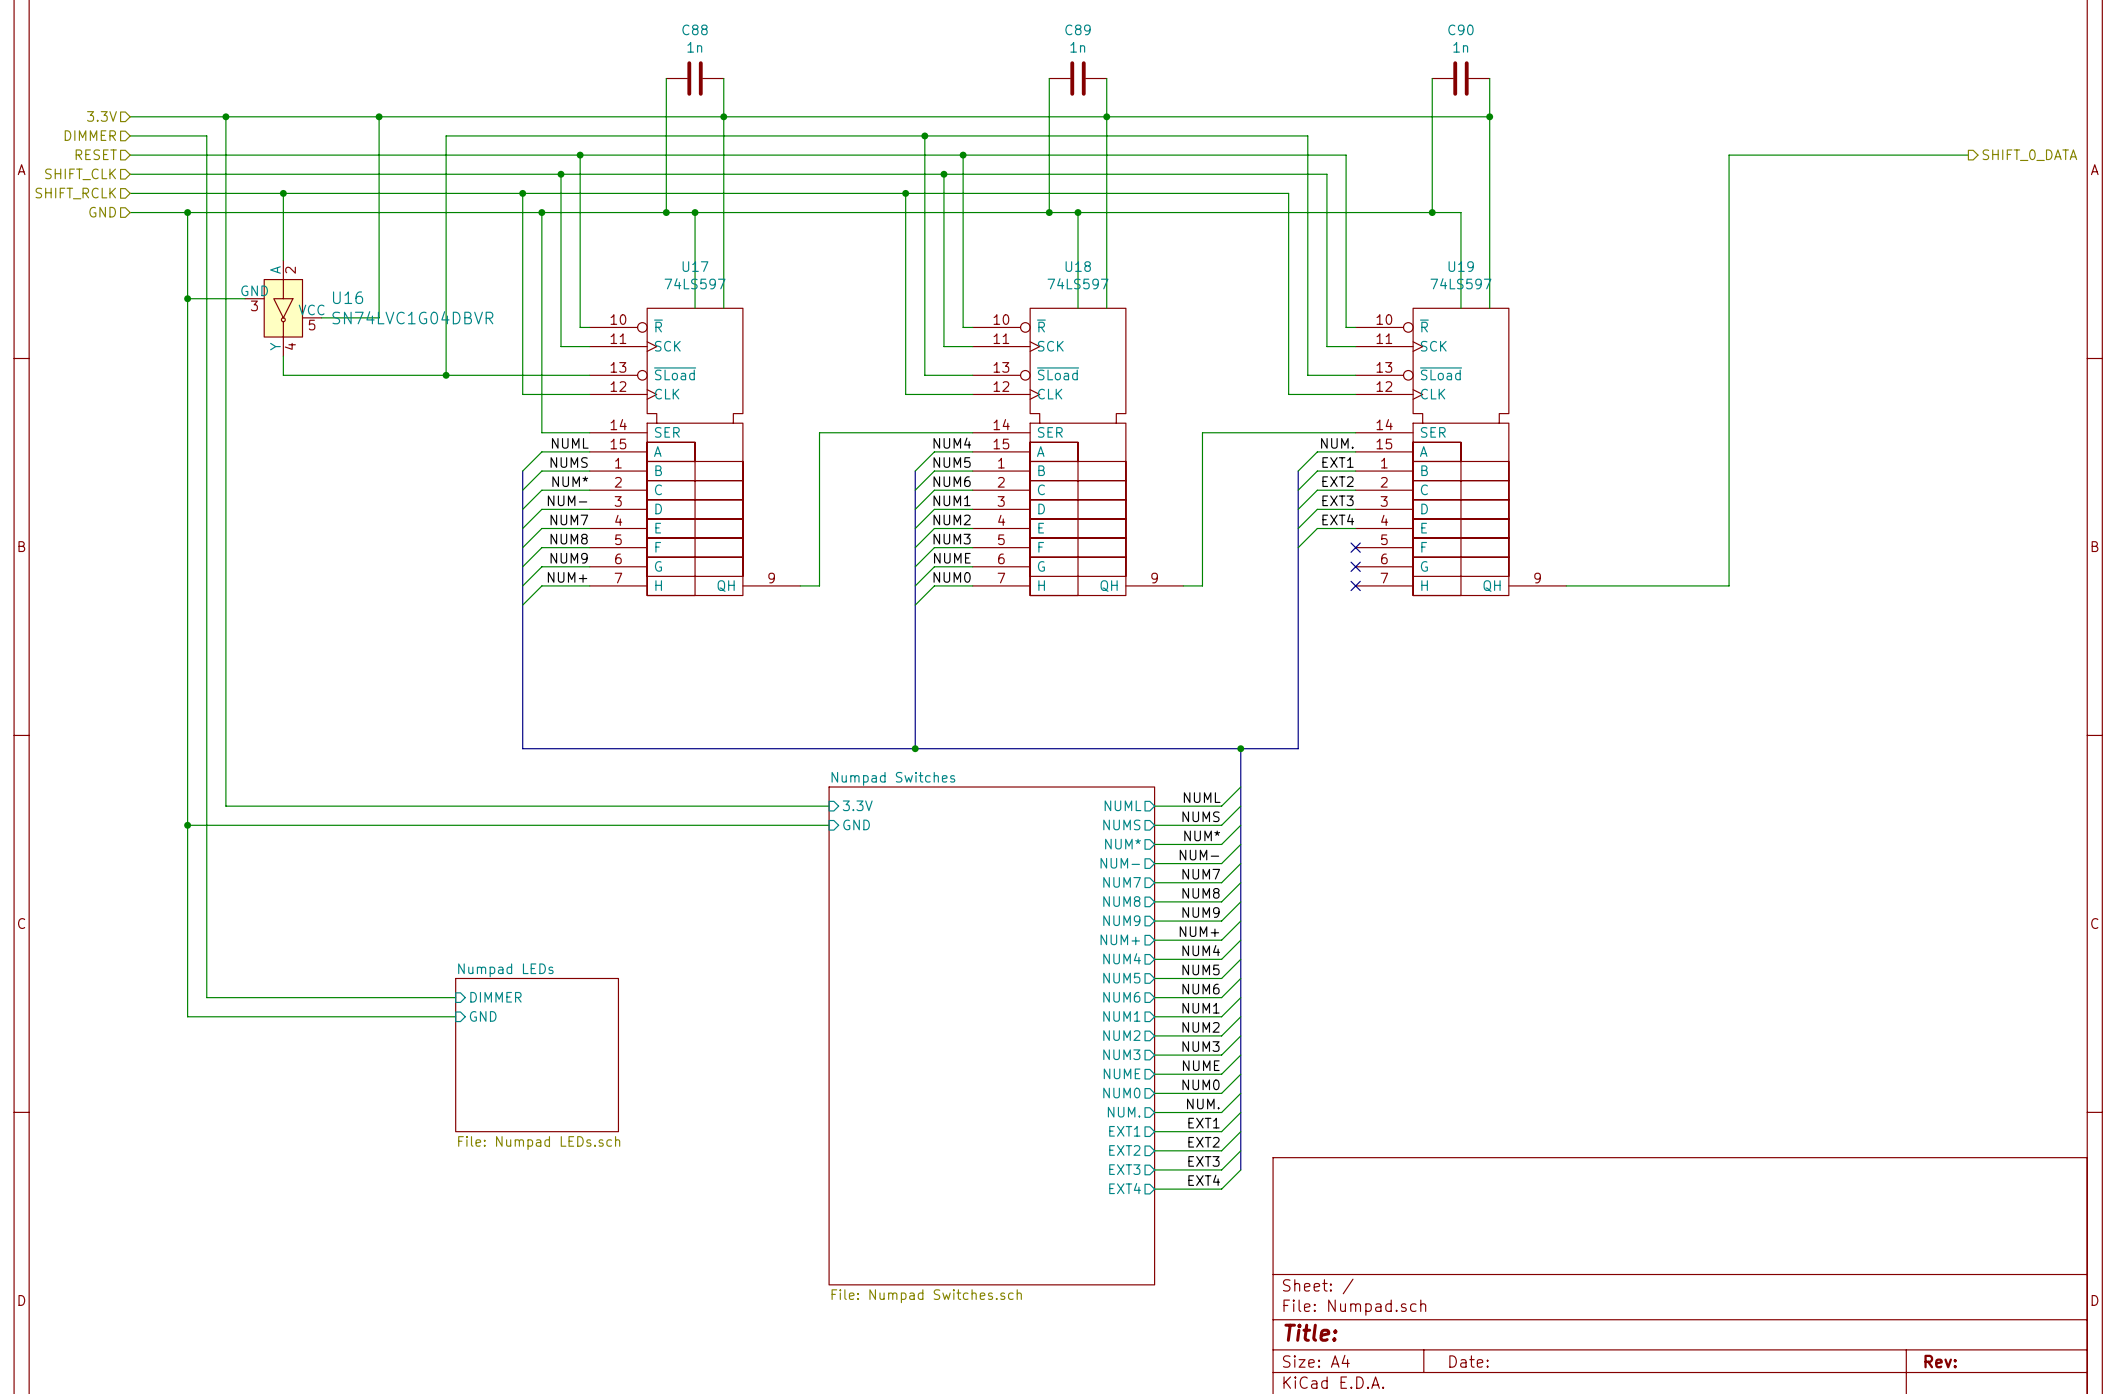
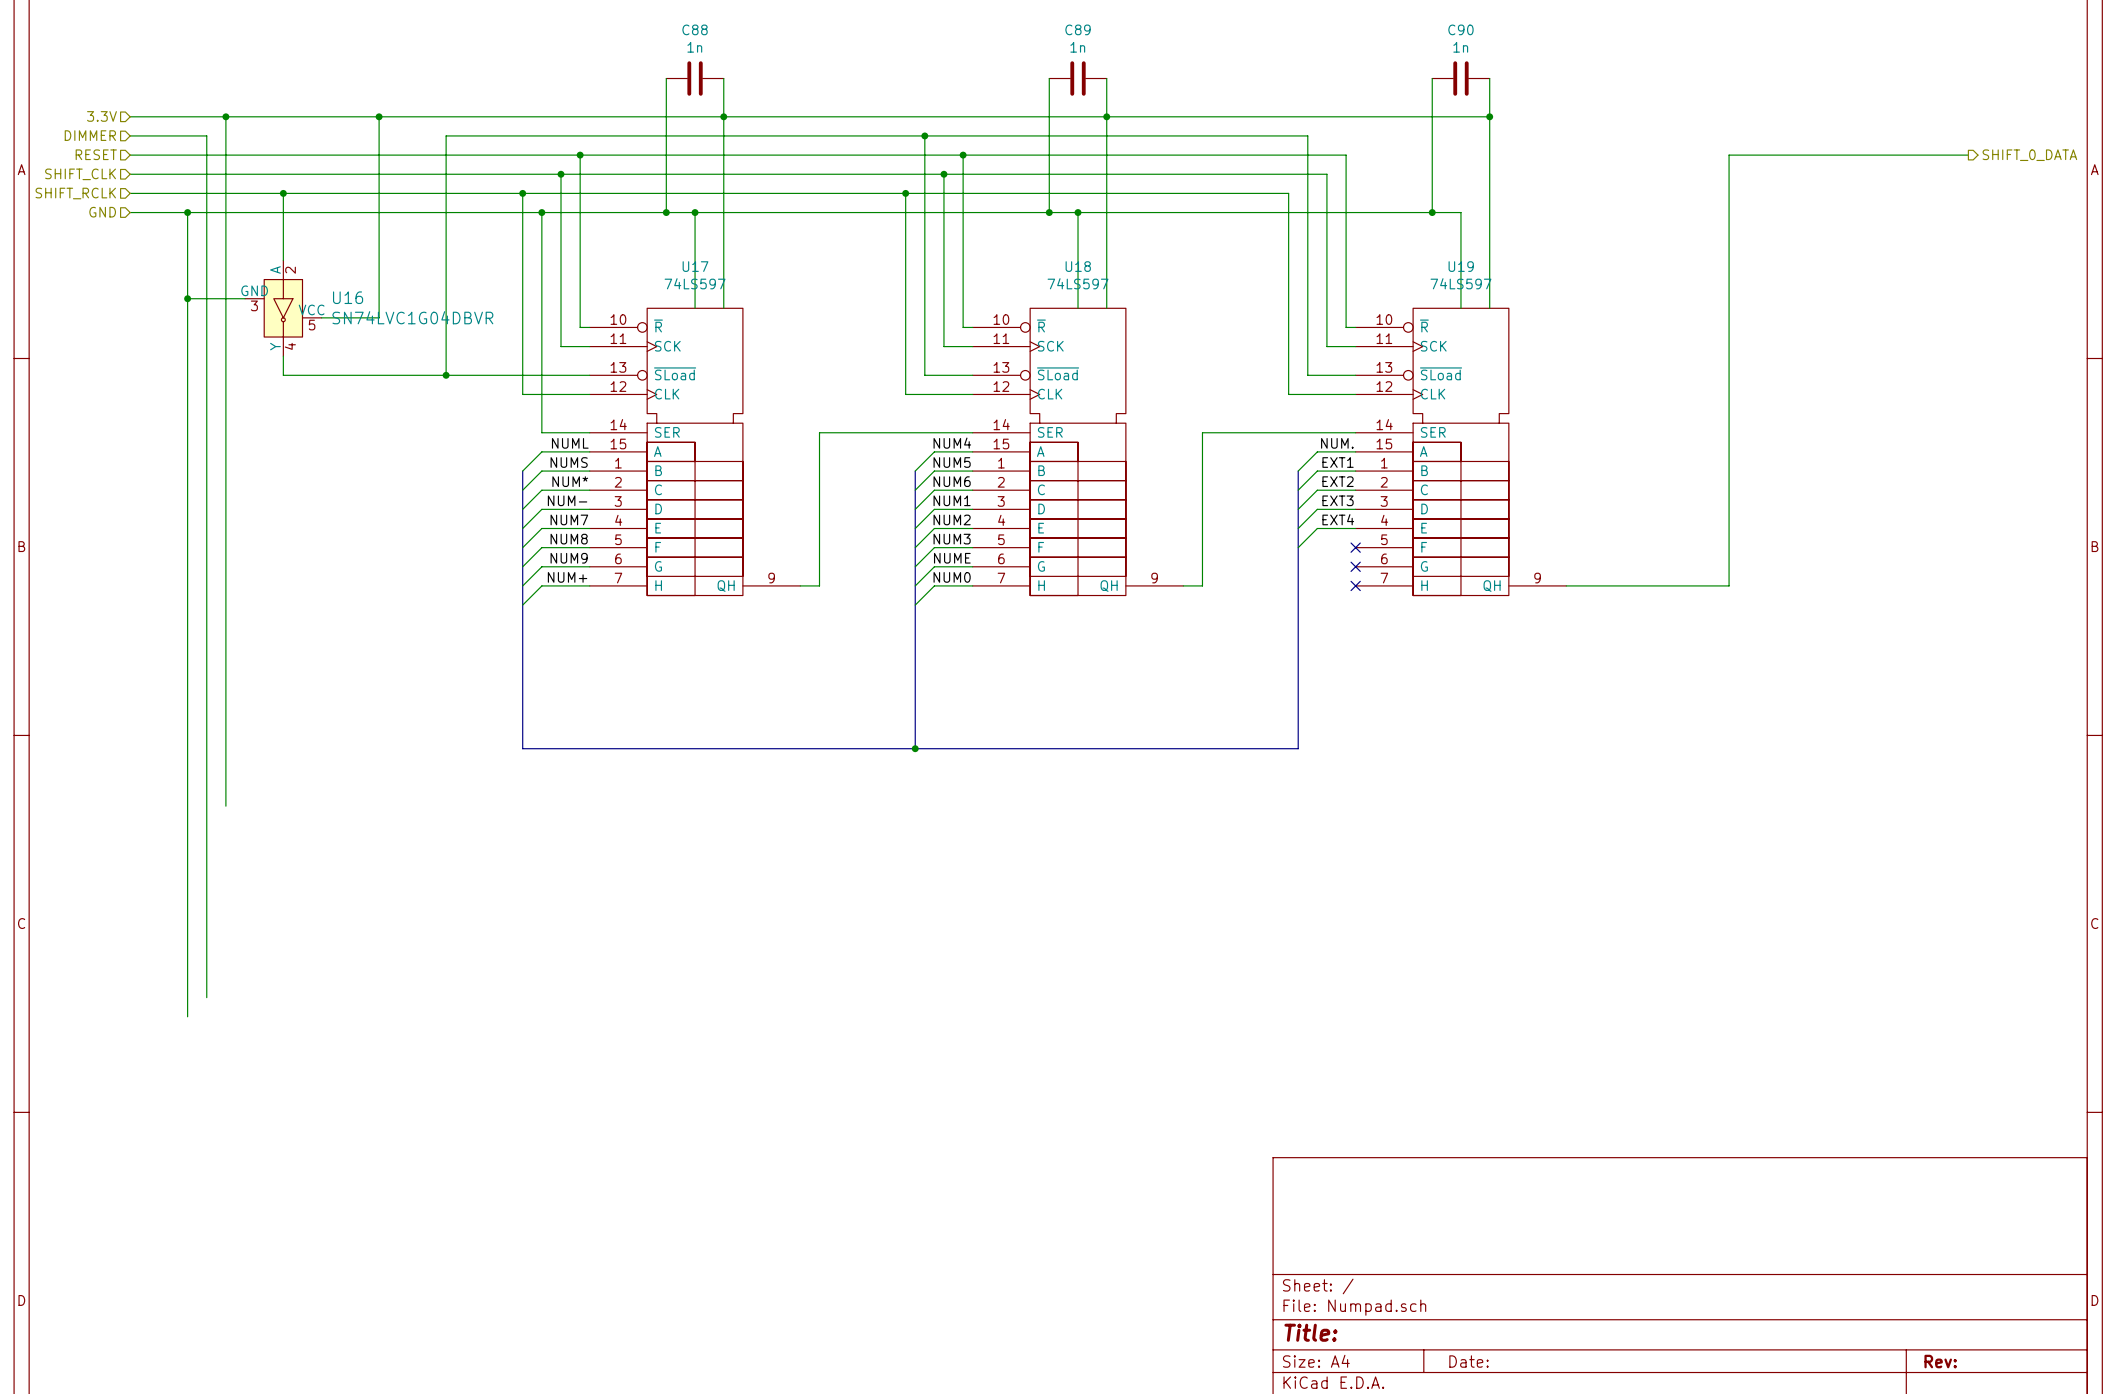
bus: (1240, 748) (1240, 1169) -> none
junction: (1240, 748) -> none
wire: (1240, 787) (1221, 806) (1154, 806) -> none
label: NUML (1202, 797) -> none
sheet pin: 3.3V (857, 805) -> none
sheet pin: NUML (1122, 805) -> none
wire: (225, 806) (829, 806) -> none
wire: (1240, 806) (1221, 825) (1154, 825) -> none
label: NUMS (1201, 816) -> none
sheet pin: GND (856, 824) -> none
sheet pin: NUMS (1121, 824) -> none
wire: (187, 825) (829, 825) -> none
junction: (187, 825) -> none
wire: (1240, 825) (1221, 844) (1154, 844) -> none
label: NUM* (1202, 835) -> none
sheet pin: NUM* (1122, 844) -> none
wire: (1240, 844) (1221, 863) (1154, 863) -> none
label: NUM- (1199, 855) -> none
sheet pin: NUM- (1120, 863) -> none
wire: (1240, 863) (1221, 882) (1154, 882) -> none
label: NUM7 (1201, 874) -> none
sheet pin: NUM7 (1122, 882) -> none
wire: (1240, 882) (1221, 901) (1154, 901) -> none
label: NUM8 (1201, 893) -> none
sheet pin: NUM8 (1121, 901) -> none
wire: (1240, 901) (1221, 921) (1154, 921) -> none
label: NUM9 (1201, 912) -> none
sheet pin: NUM9 (1121, 920) -> none
wire: (1240, 921) (1221, 940) (1154, 940) -> none
label: NUM+ (1199, 931) -> none
sheet pin: NUM+ (1120, 939) -> none
wire: (1240, 940) (1221, 959) (1154, 959) -> none
label: NUM4 (1201, 950) -> none
sheet pin: NUM4 (1122, 958) -> none
wire: (1240, 959) (1221, 978) (1154, 978) -> none
label: NUM5 (1201, 969) -> none
sheet pin: NUM5 (1121, 978) -> none
wire: (1240, 978) (1221, 997) (1154, 997) -> none
label: NUM6 (1201, 989) -> none
wire: (206, 997) (455, 997) -> none
sheet pin: DIMMER (495, 997) -> none
sheet pin: NUM6 (1121, 997) -> none
wire: (1240, 997) (1221, 1016) (1154, 1016) -> none
label: NUM1 (1201, 1008) -> none
wire: (187, 1016) (455, 1016) -> none
sheet pin: GND (483, 1016) -> none
sheet pin: NUM1 (1121, 1016) -> none
wire: (1240, 1016) (1221, 1035) (1154, 1035) -> none
label: NUM2 (1201, 1027) -> none
sheet Numpad Switches: File: Numpad Switches.sch (991, 1035) -> none
sheet pin: NUM2 (1121, 1035) -> none
wire: (1240, 1035) (1221, 1055) (1154, 1055) -> none
label: NUM3 (1201, 1046) -> none
sheet pin: NUM3 (1121, 1054) -> none
sheet Numpad LEDs: File: Numpad LEDs.sch (537, 1055) -> none
wire: (1240, 1055) (1221, 1074) (1154, 1074) -> none
label: NUME (1201, 1065) -> none
sheet pin: NUME (1122, 1073) -> none
wire: (1240, 1074) (1221, 1093) (1154, 1093) -> none
label: NUM0 (1201, 1084) -> none
sheet pin: NUM0 (1121, 1093) -> none
wire: (1240, 1093) (1221, 1112) (1154, 1112) -> none
label: NUM. (1203, 1103) -> none
sheet pin: NUM. (1124, 1112) -> none
wire: (1240, 1112) (1221, 1131) (1154, 1131) -> none
label: EXT1 (1203, 1123) -> none
sheet pin: EXT1 (1124, 1131) -> none
wire: (1240, 1131) (1221, 1150) (1154, 1150) -> none
label: EXT2 (1203, 1142) -> none
sheet pin: EXT2 (1124, 1150) -> none
wire: (1240, 1150) (1221, 1169) (1154, 1169) -> none
label: EXT3 (1203, 1161) -> none
sheet pin: EXT3 (1124, 1169) -> none
wire: (1240, 1169) (1221, 1189) (1154, 1189) -> none
label: EXT4 (1204, 1180) -> none
sheet pin: EXT4 (1125, 1188) -> none

